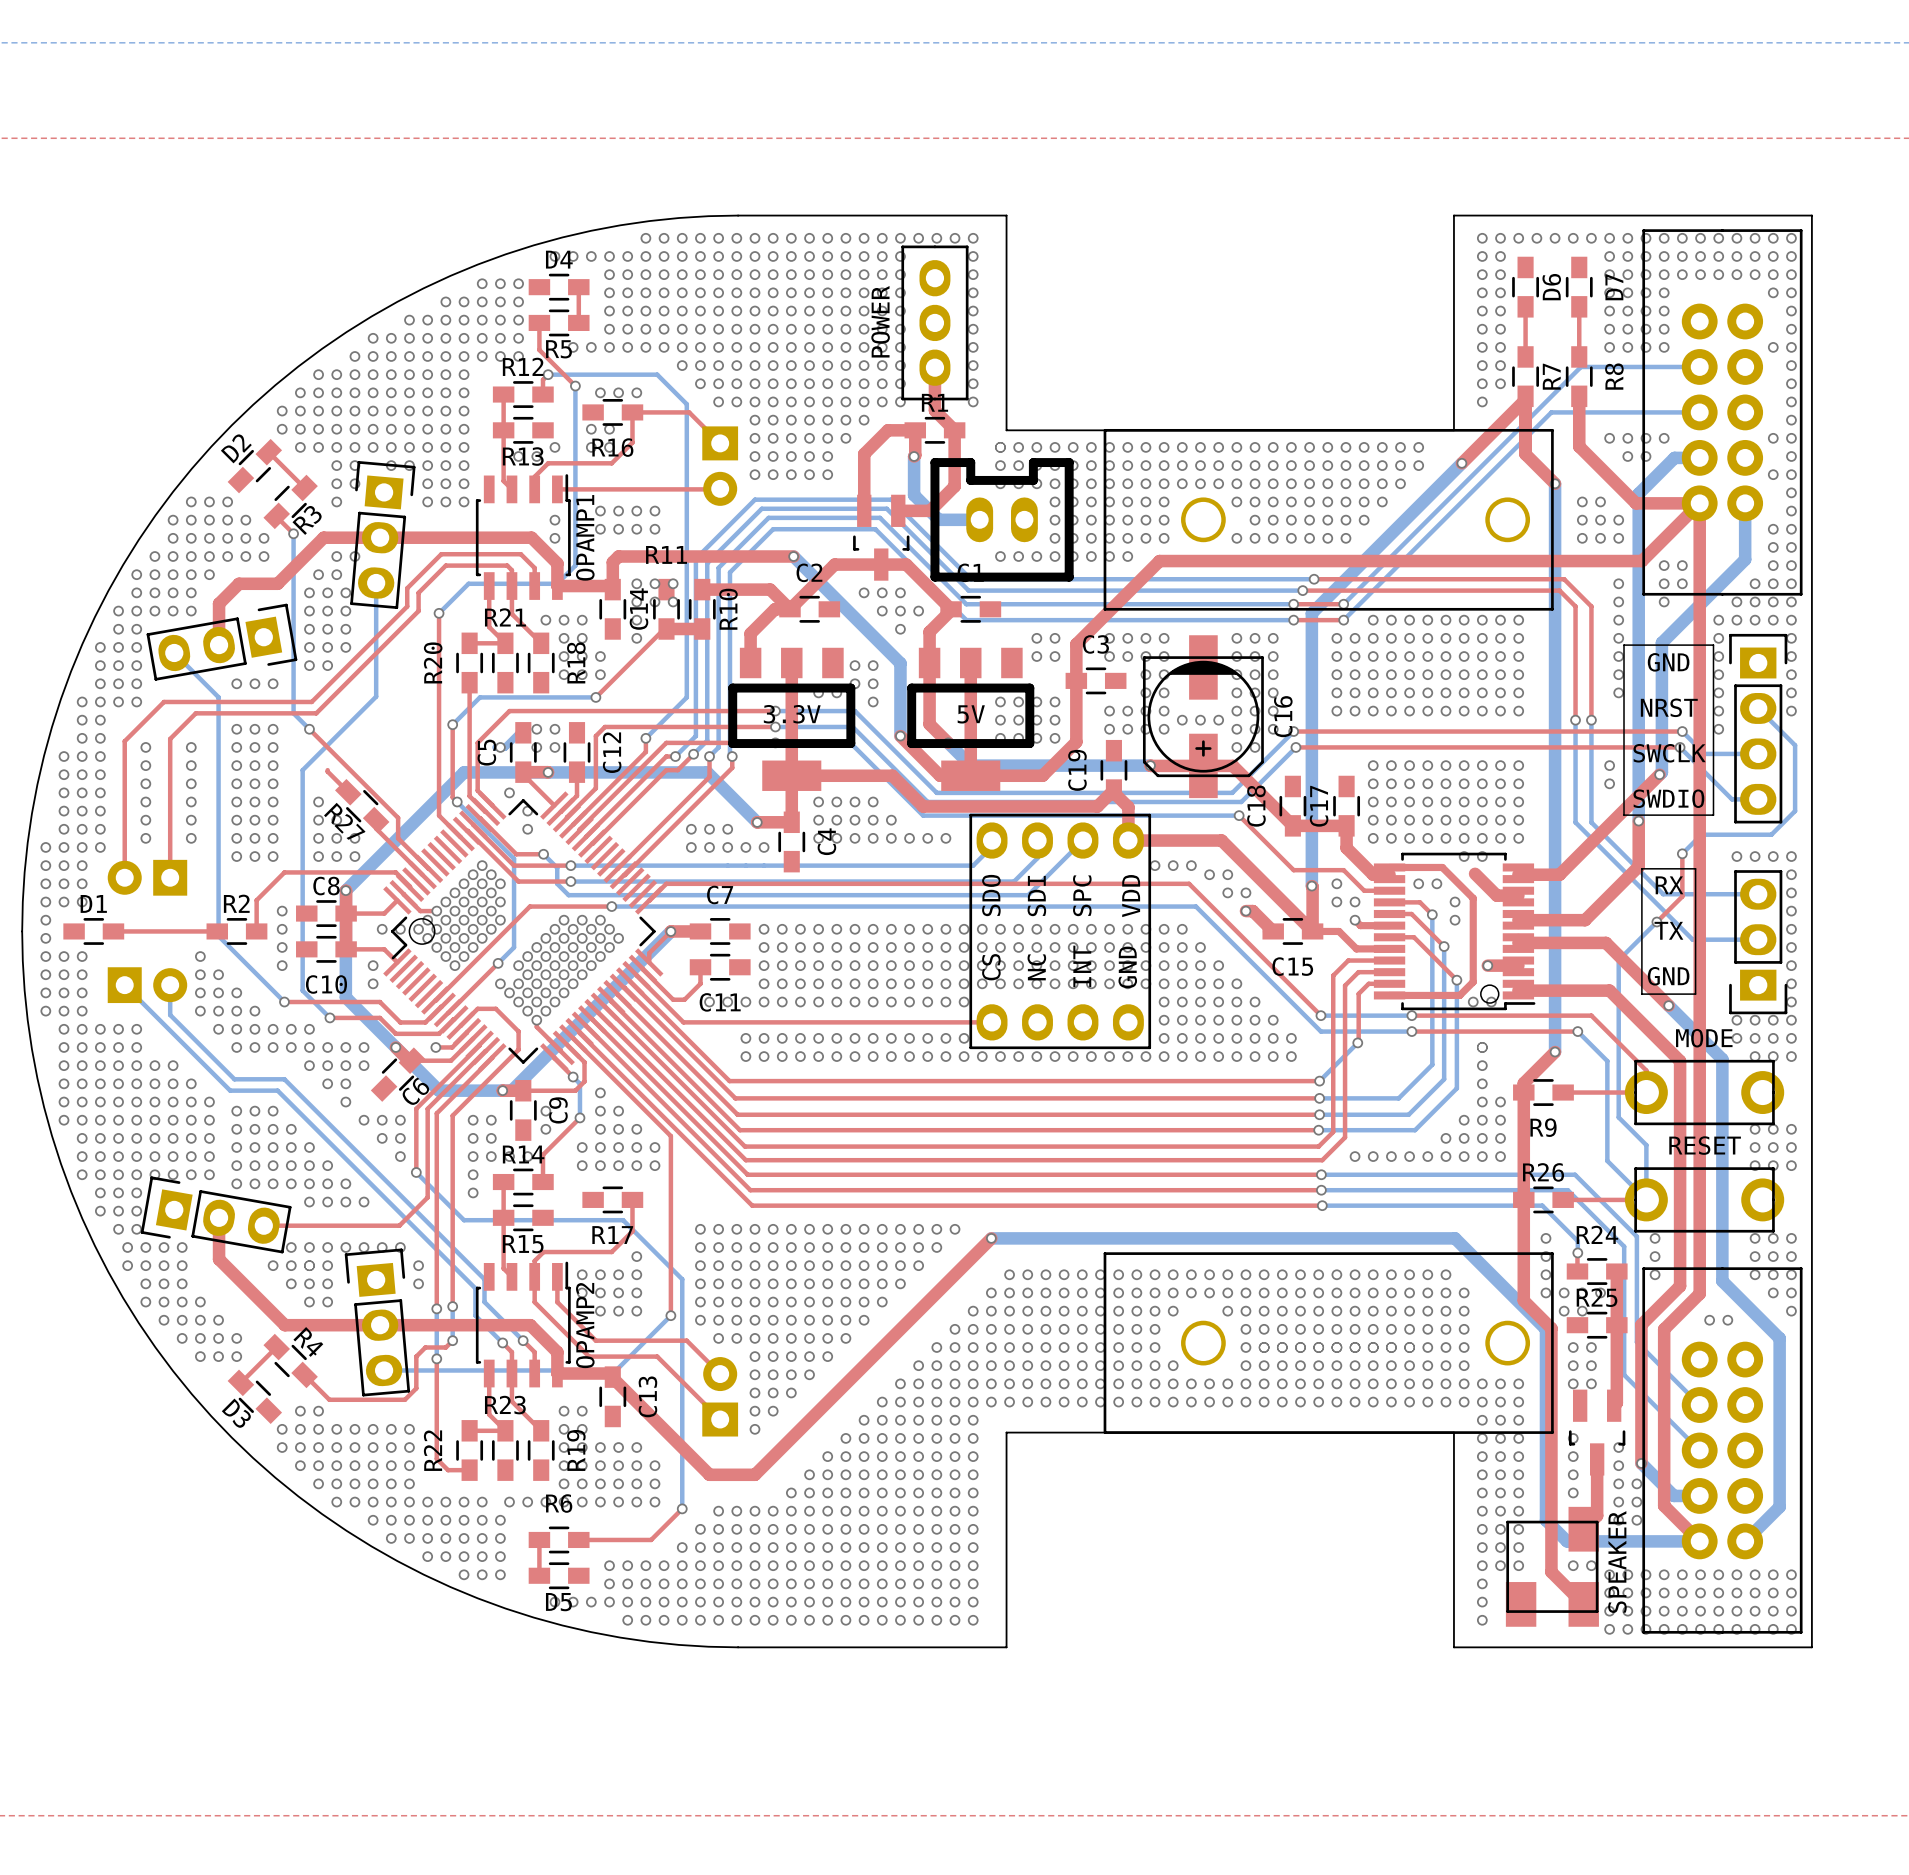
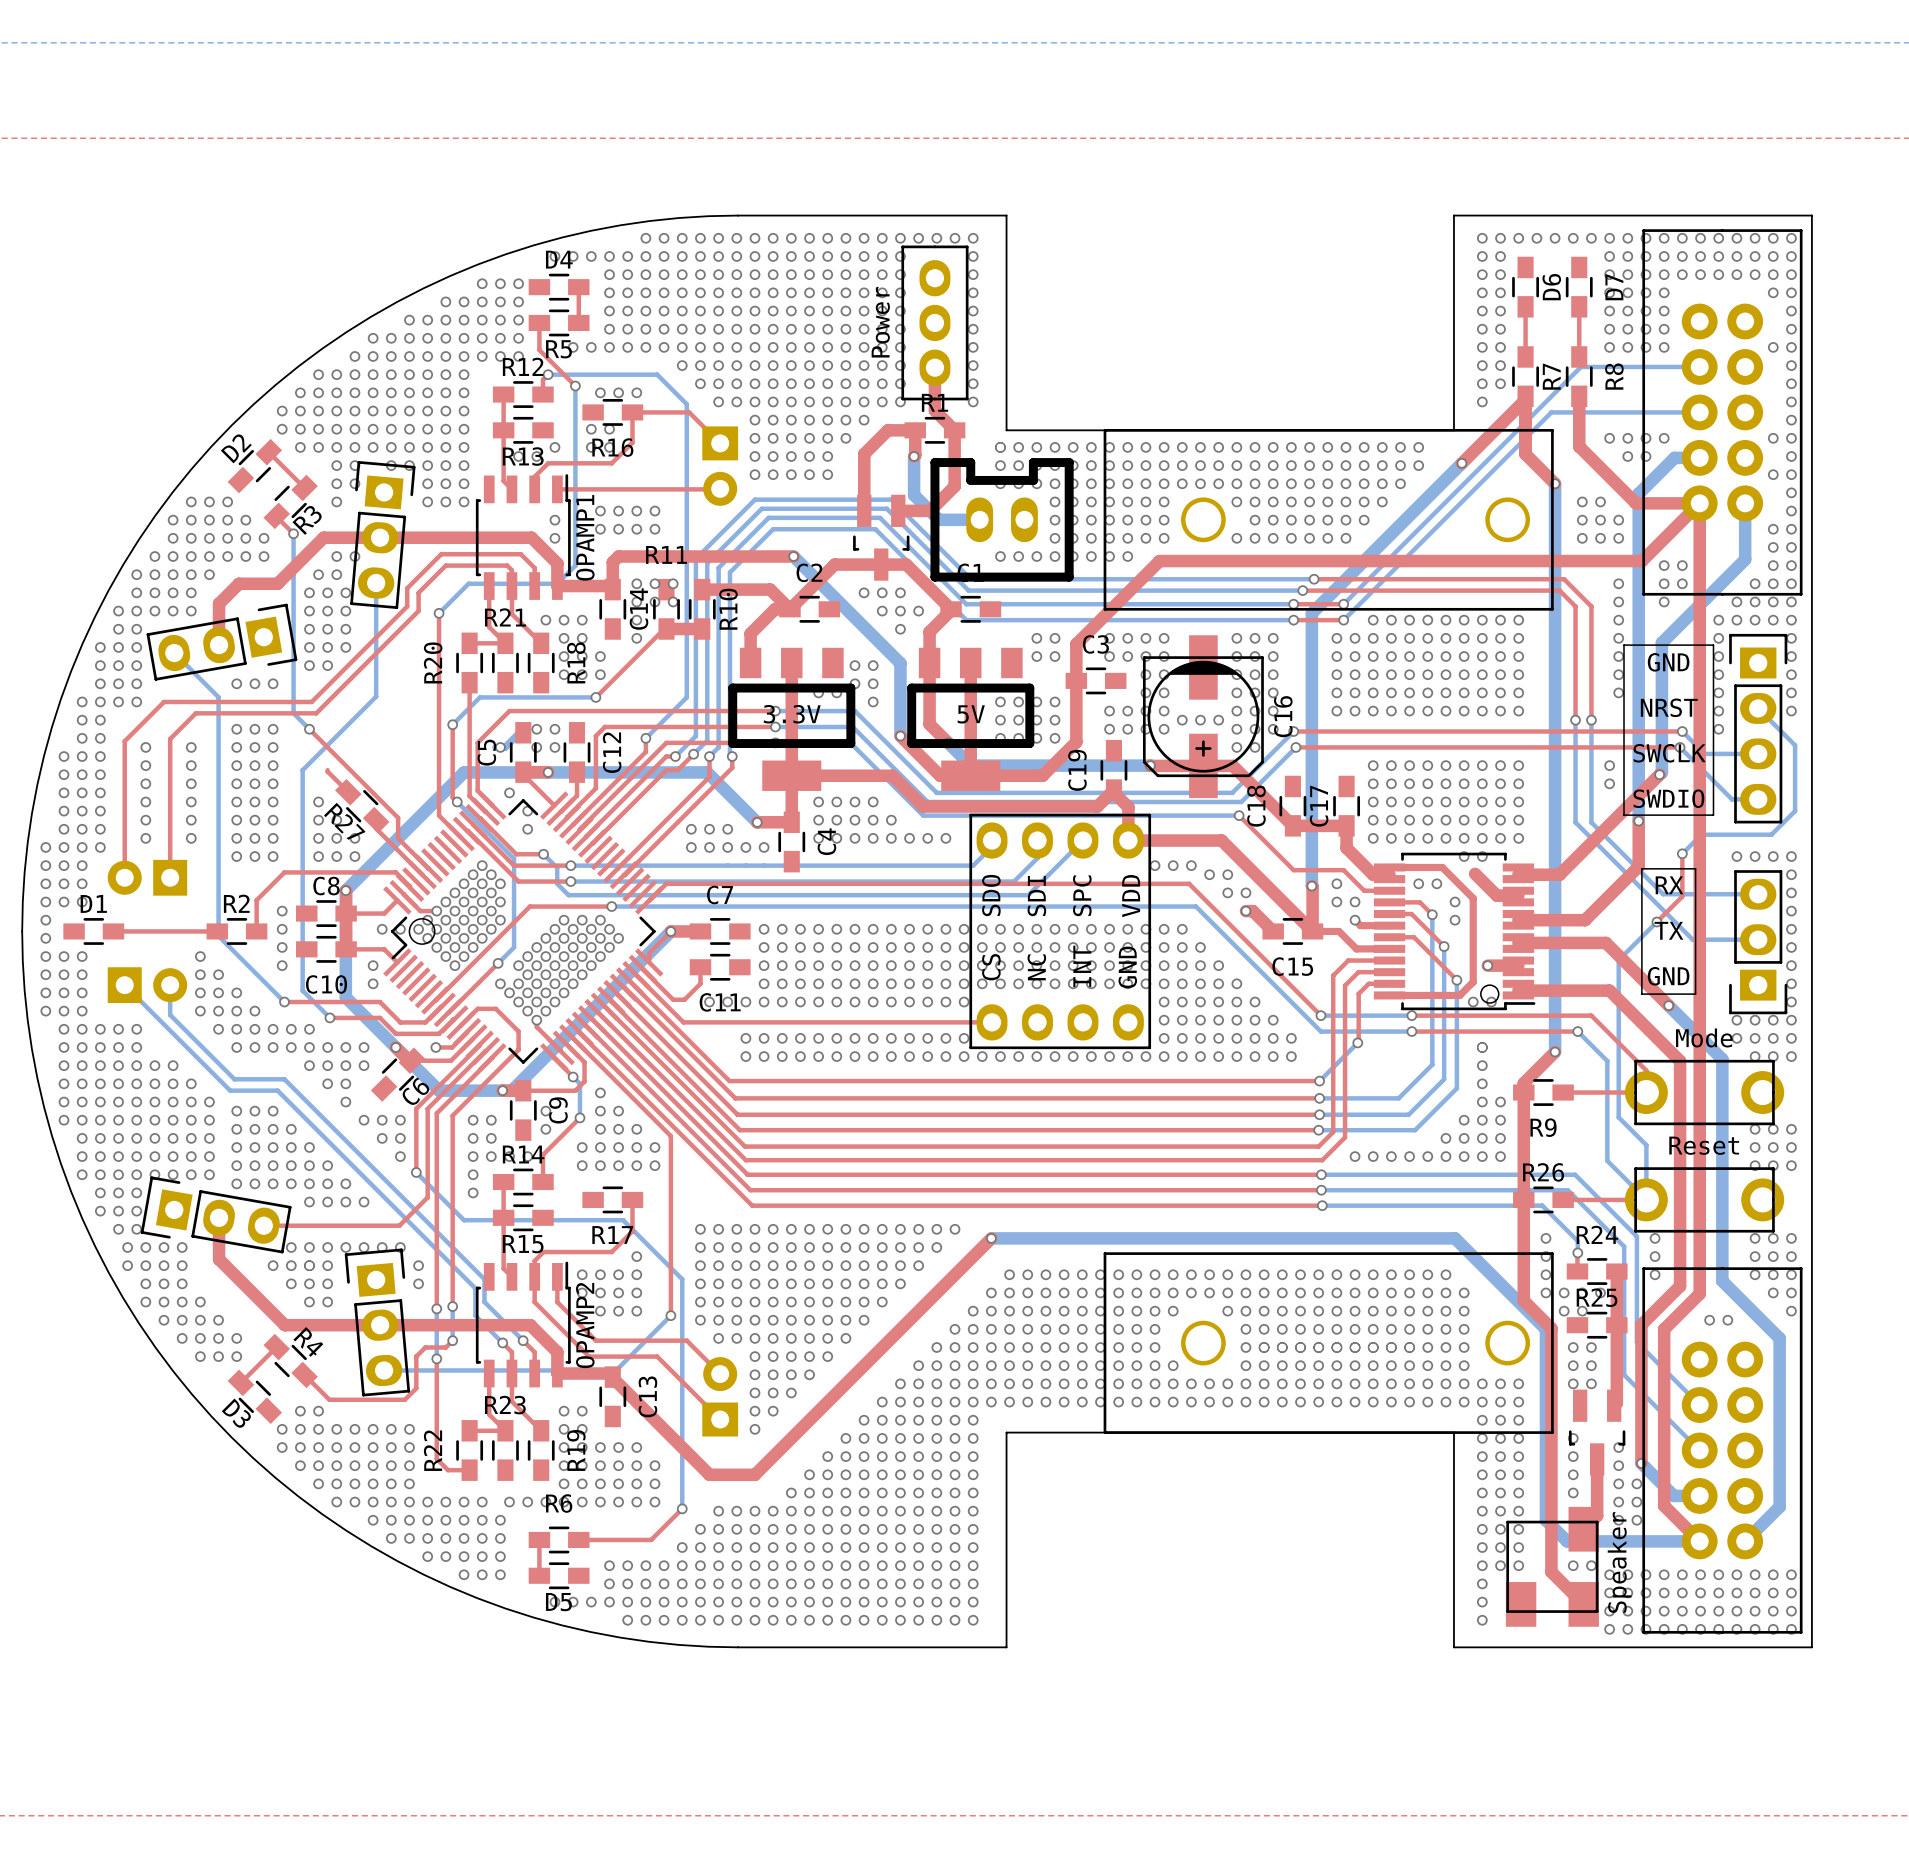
POWER name: POWER (880, 321) -> Power (880, 322)
MODE name: MODE (1704, 1038) -> Mode (1704, 1037)
RESET name: RESET (1705, 1145) -> Reset (1704, 1145)
SPEAKER name: SPEAKER (1617, 1562) -> Speaker (1619, 1562)

